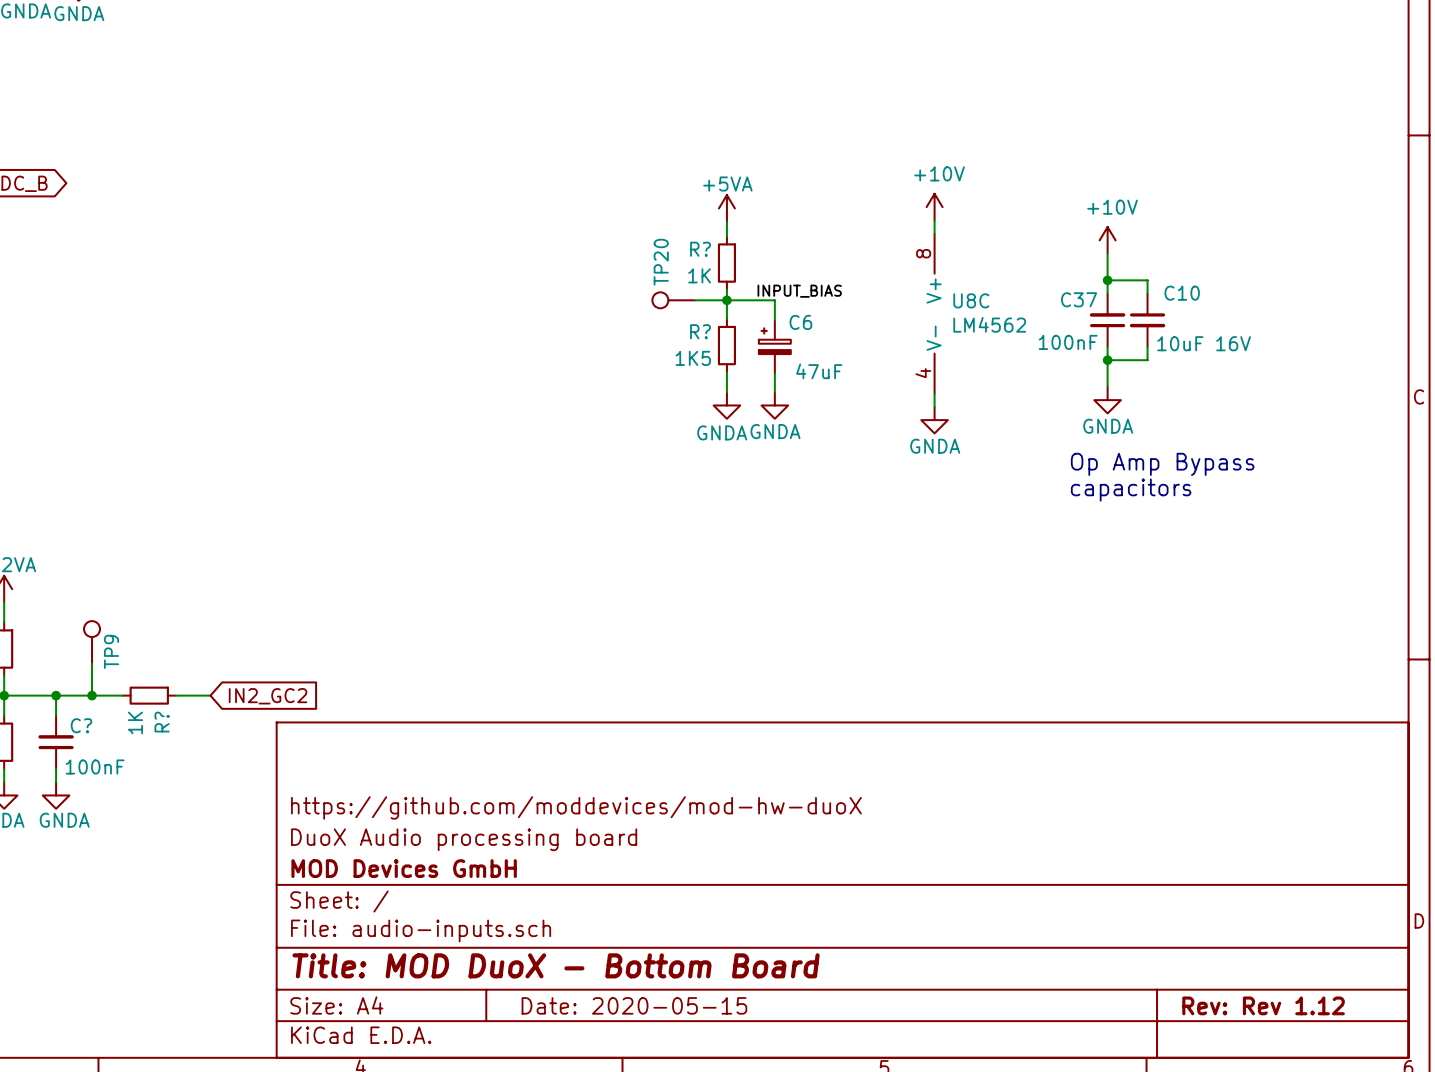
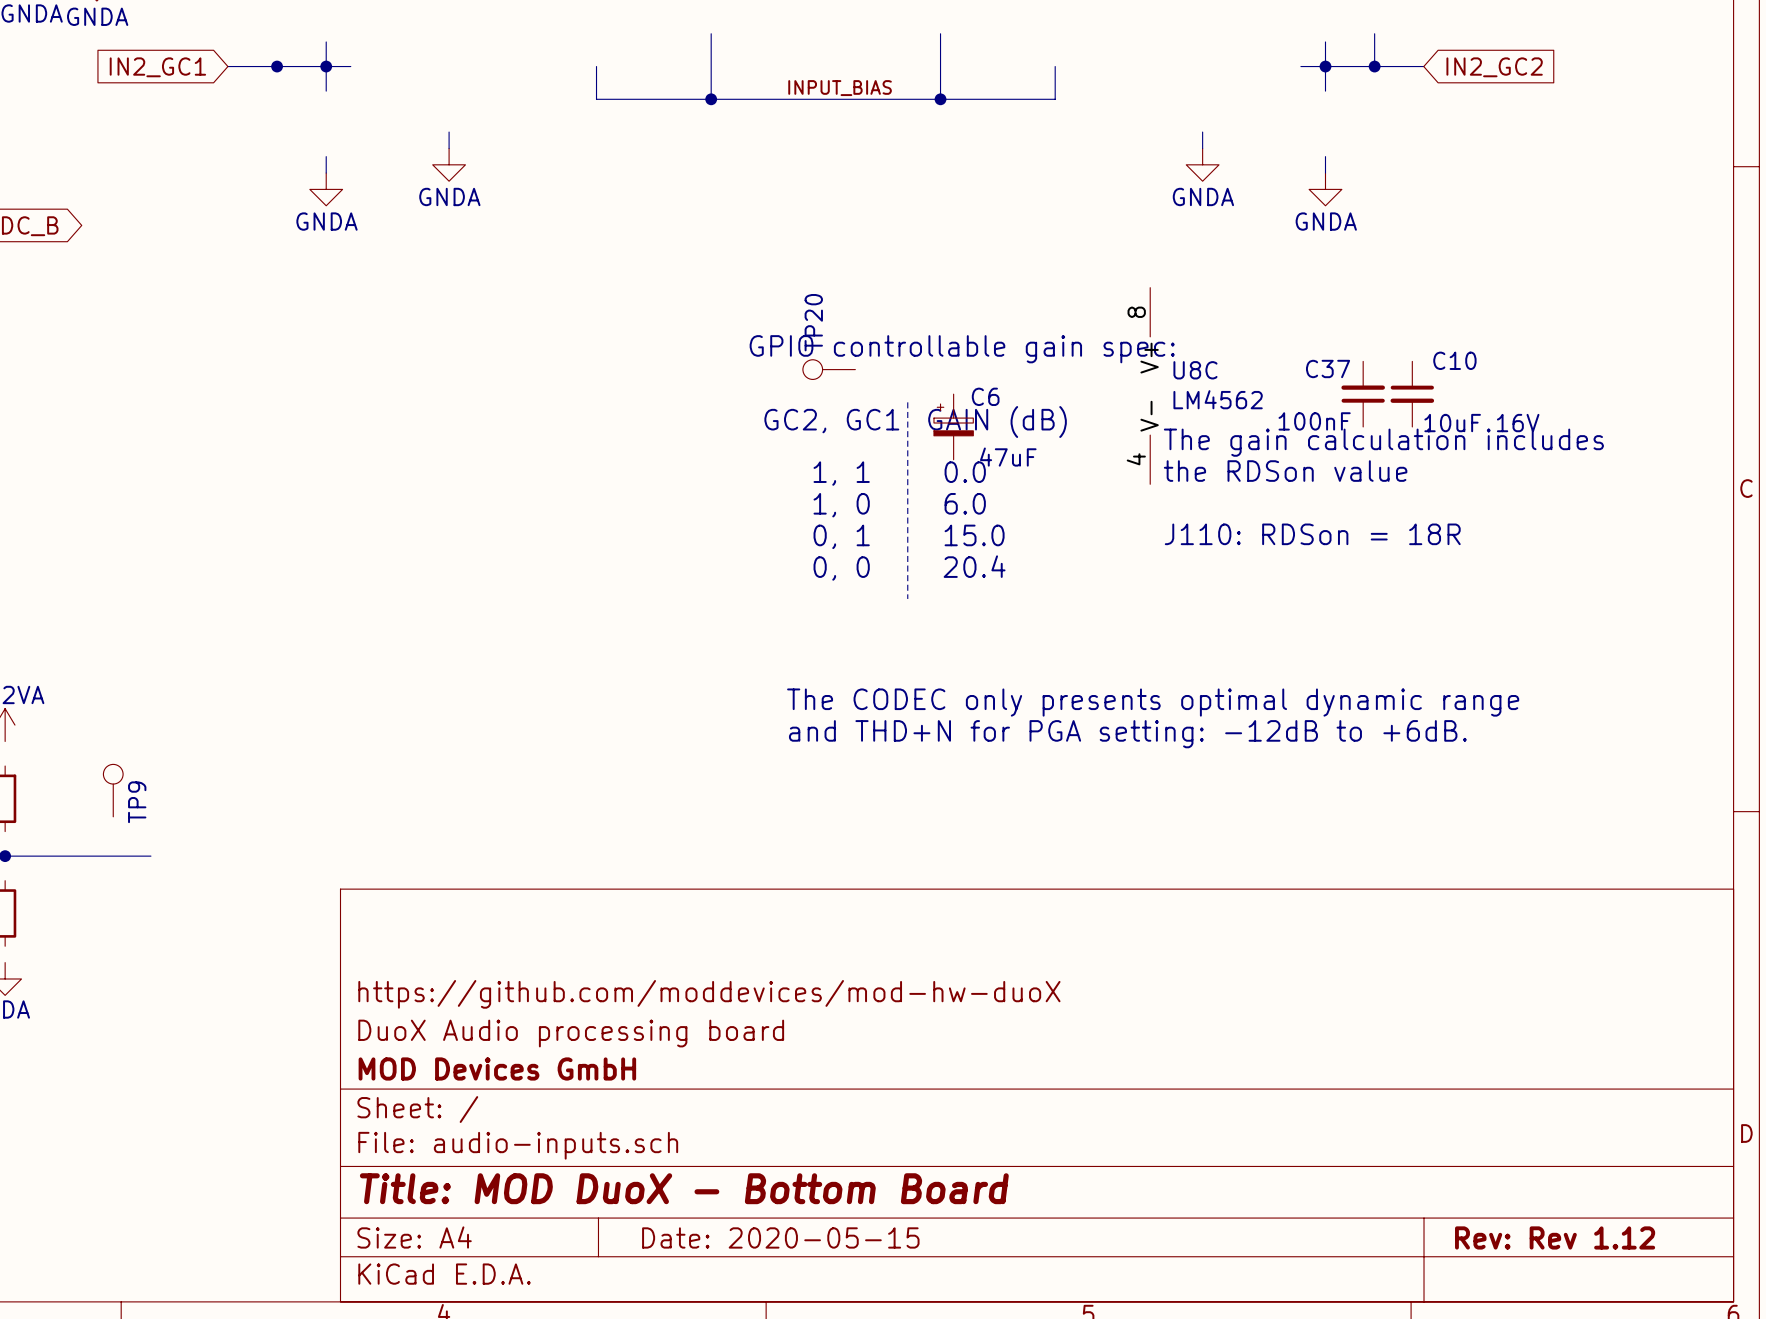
wire: none -> (711, 33) (711, 99)
wire: none -> (940, 33) (940, 99)
wire: none -> (1374, 33) (1374, 66)
wire: none -> (326, 41) (326, 91)
global label: none -> IN2_GC1 (157, 67)
wire: none -> (227, 66) (350, 66)
junction: none -> (277, 66)
junction: none -> (326, 66)
wire: none -> (596, 66) (596, 99) (1055, 99) (1055, 66)
wire: none -> (1300, 66) (1423, 66)
junction: none -> (1325, 66)
junction: none -> (1374, 66)
global label: none -> IN2_GC2 (1494, 67)
junction: none -> (711, 99)
junction: none -> (940, 99)
wire: none -> (449, 132) (449, 148)
wire: none -> (326, 156) (326, 173)
wire: none -> (1325, 156) (1325, 173)
power symbol: none -> GNDA (449, 164)
power symbol: none -> GNDA (1202, 164)
power symbol: none -> GNDA (326, 189)
power symbol: none -> GNDA (1325, 189)
power symbol: +10V (934, 207) -> none
power symbol: +5VA (726, 208) -> none
wire: (934, 220) (934, 233) -> (1202, 132) (1202, 148)
wire: (726, 221) (726, 236) -> none
power symbol: +10V (1107, 240) -> none
wire: (1107, 253) (1107, 293) -> (1325, 41) (1325, 91)
R?: 1K (726, 263) -> none
wire: (1107, 280) (1147, 280) (1147, 293) -> none
junction: (1107, 280) -> none
text: none -> GPIO controllable gain spec: (962, 349)
wire: (726, 289) (726, 318) -> none
label position: INPUT_BIAS (799, 291) -> INPUT_BIAS (840, 88)
wire: (694, 300) (774, 300) (774, 320) -> none
junction: (726, 300) -> none
line: none -> (907, 402) (907, 598)
text: none -> GC2, GC1 (831, 421)
text: none -> GAIN (dB) (997, 422)
R?: 1K5 (726, 345) -> none
wire: (1107, 346) (1107, 386) -> none
wire: (1147, 346) (1147, 360) (1107, 360) -> none
text: none -> The gain calculation includes (1383, 442)
junction: (1107, 360) -> none
wire: (726, 372) (726, 392) -> none
wire: (774, 373) (774, 392) -> none
text: none -> the RDSon value (1285, 471)
text: none -> 0.0 (965, 472)
text: none -> 1, 1 (841, 473)
wire: (934, 393) (934, 406) -> none
power symbol: GNDA (1107, 400) -> none
power symbol: GNDA (726, 405) -> none
power symbol: GNDA (774, 405) -> none
text: none -> 6.0 (965, 503)
text: none -> 1, 0 (841, 505)
power symbol: GNDA (934, 420) -> none
text: none -> J110: RDSon = 18R (1312, 534)
text: none -> 15.0 (974, 535)
text: none -> 0, 1 (841, 536)
text: none -> 20.4 (974, 566)
text: none -> 0, 0 (841, 568)
text: Op Amp Bypass (1162, 464) -> none
text: capacitors (1131, 490) -> none
text: none -> The CODEC only presents optimal dynamic range (1153, 702)
text: none -> and THD+N for PGA setting: -12dB to +6dB. (1127, 734)
wire: (4, 602) (4, 622) -> none
wire: (92, 663) (92, 695) -> none
wire: (4, 675) (4, 715) -> none
wire: (56, 695) (56, 715) -> none
junction: (56, 695) -> none
junction: (92, 695) -> none
R?: 1K (149, 695) -> none
wire: (175, 695) (210, 695) -> none
global label: IN2_GC2 (268, 696) -> none
C?: 100nF (56, 742) -> none
wire: (4, 768) (4, 782) -> none
wire: (56, 768) (56, 782) -> none
power symbol: GNDA (56, 795) -> none

